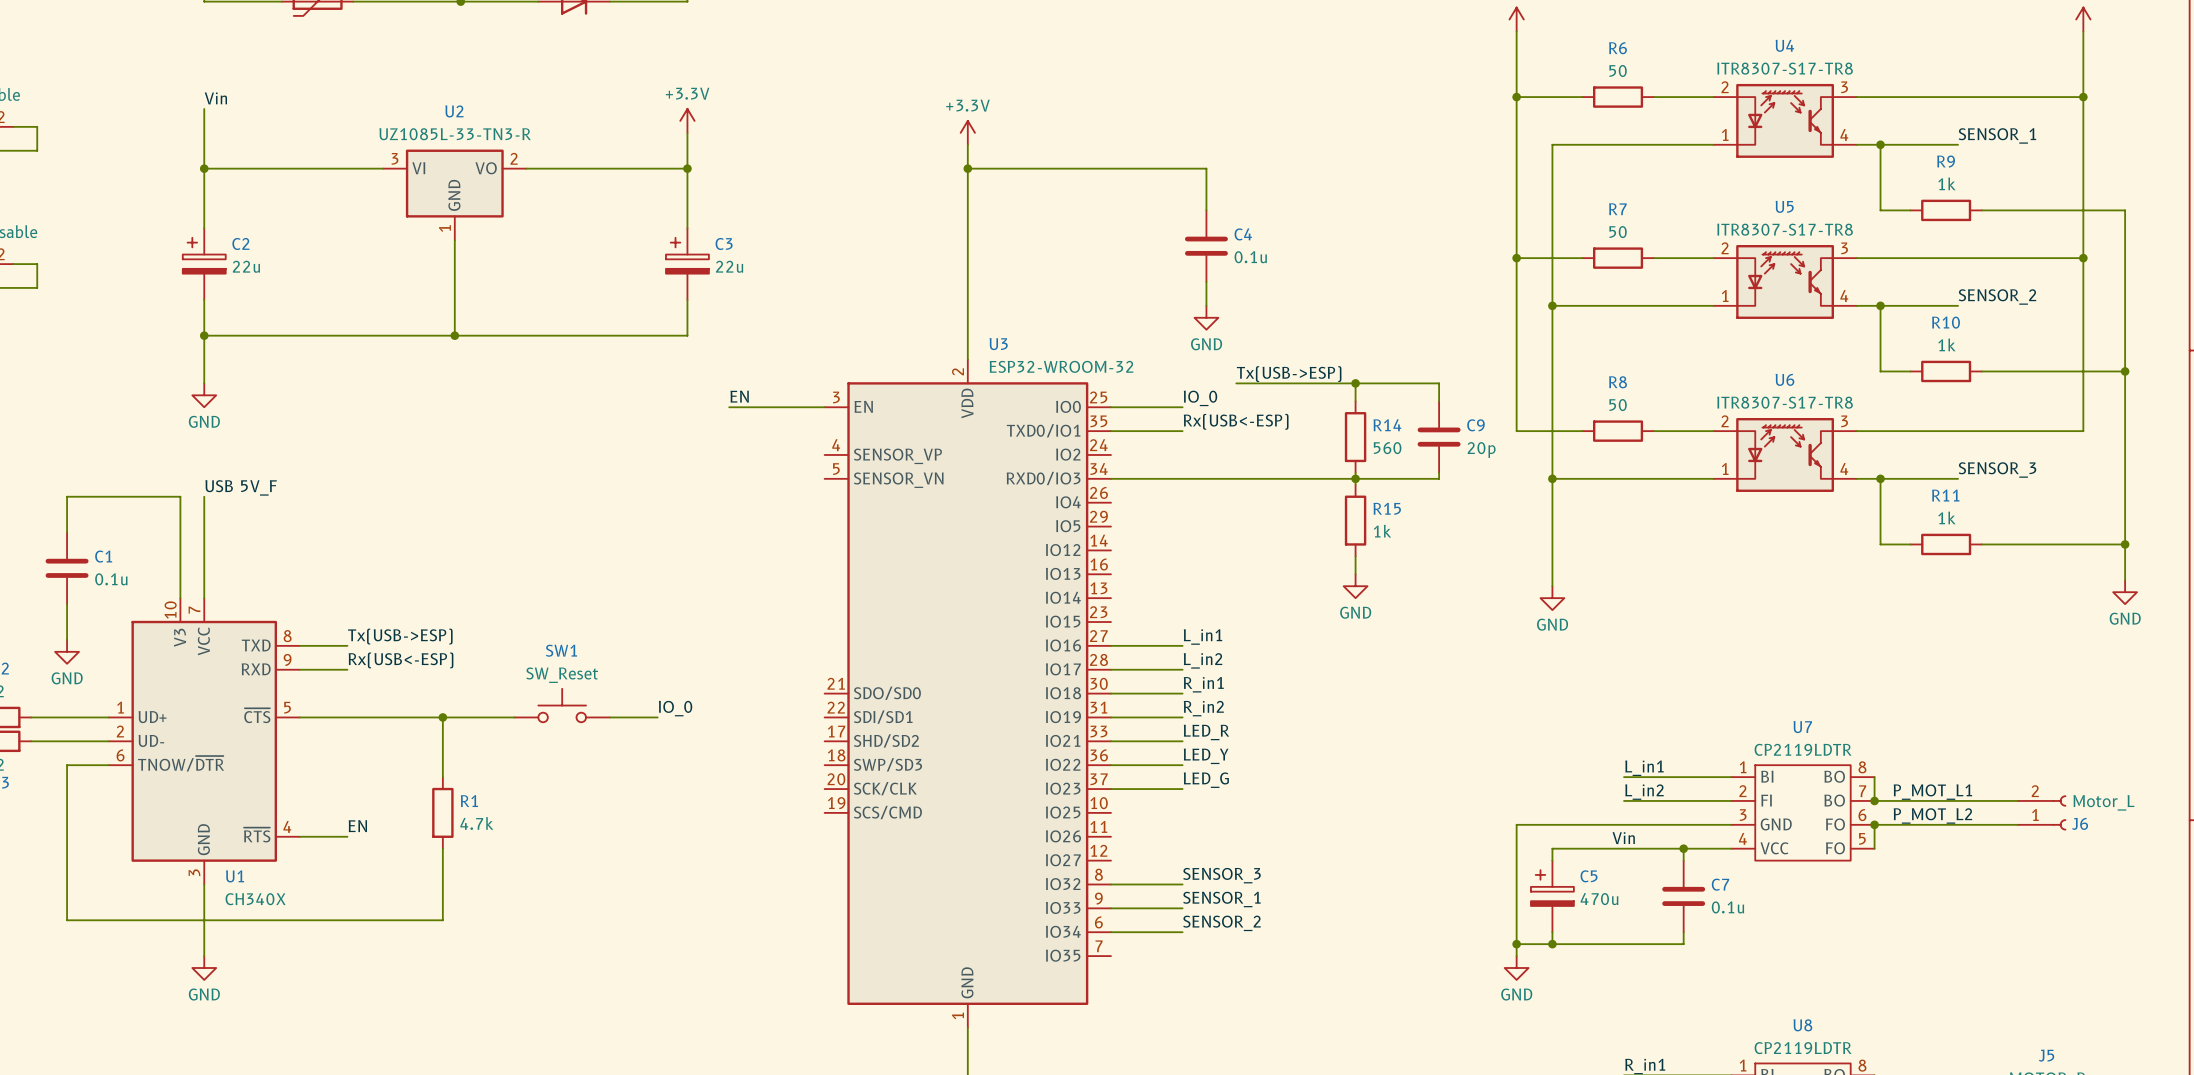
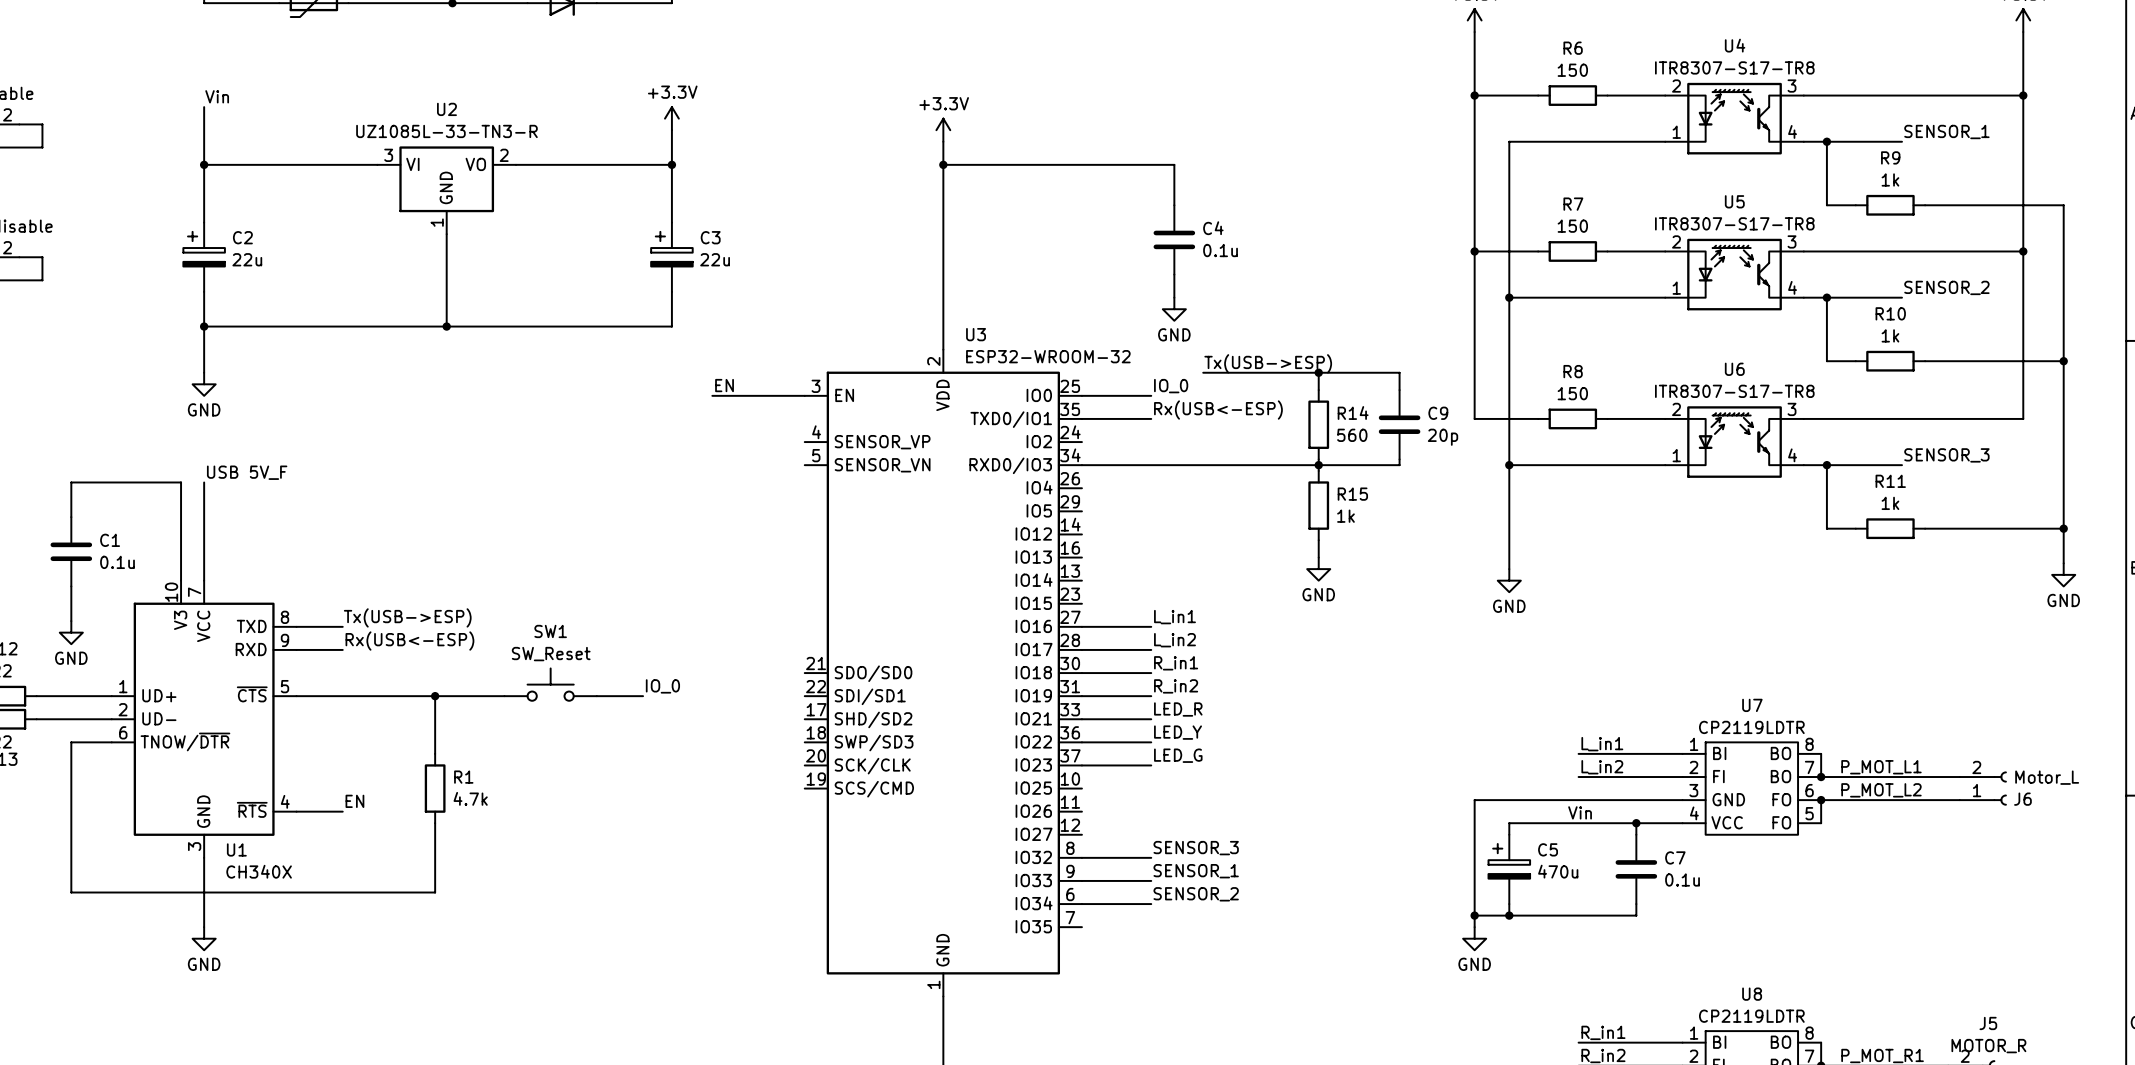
R6 value: 50 (1618, 70) -> 150 (1572, 70)
R7 value: 50 (1618, 232) -> 150 (1572, 226)
R8 value: 50 (1618, 405) -> 150 (1572, 393)

